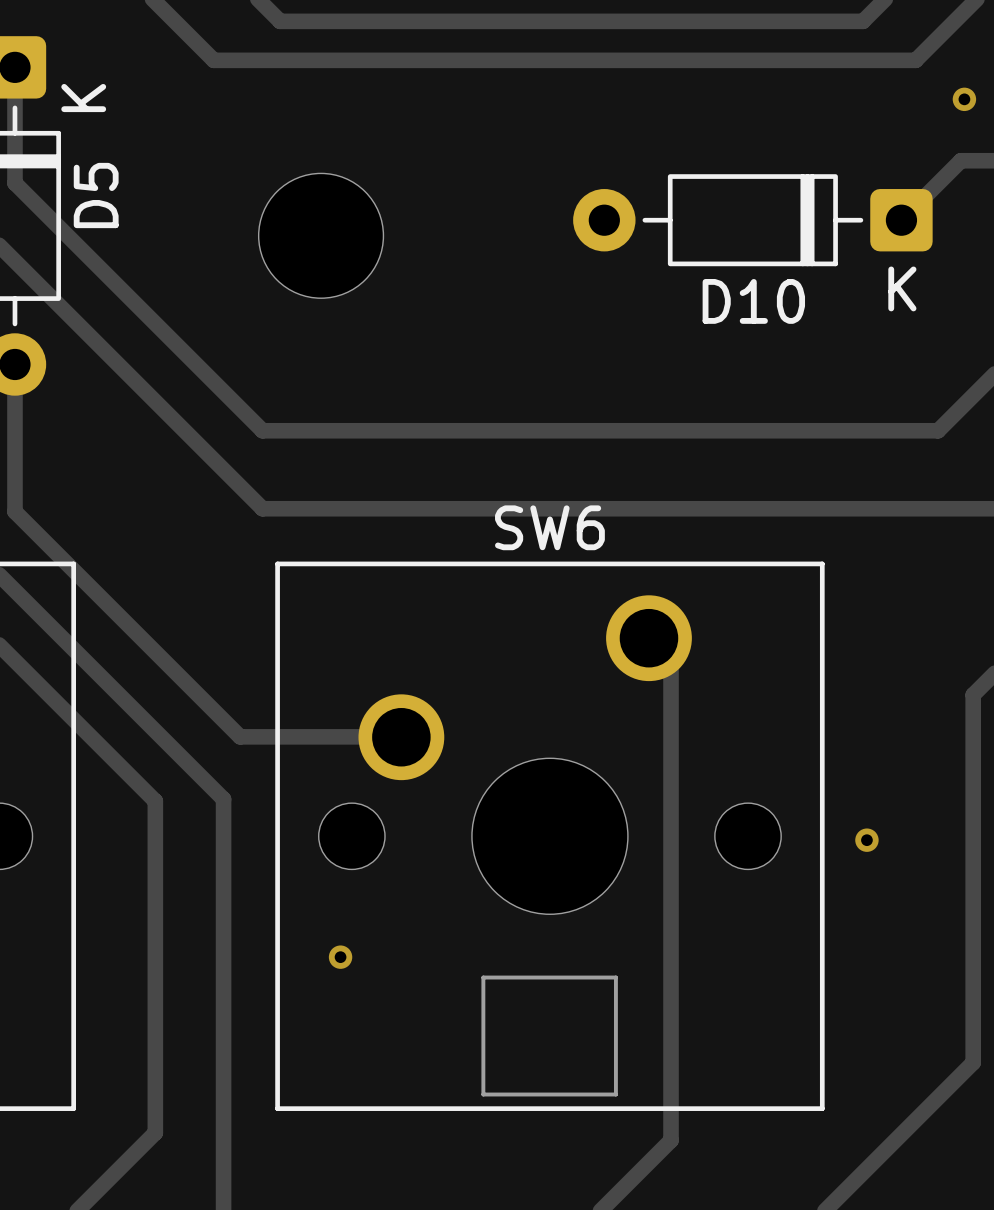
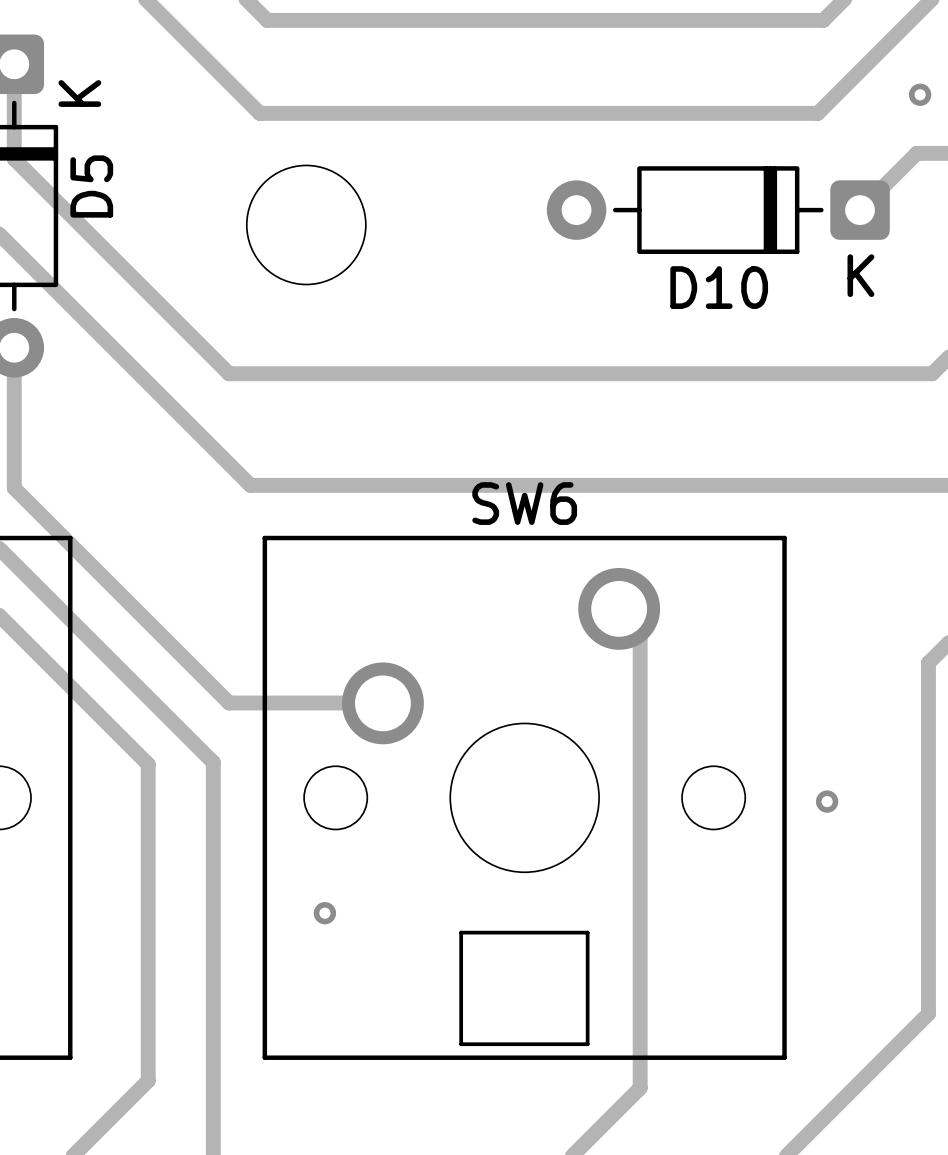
track: (213, 60) (915, 60) -> (204, 57) (259, 113) (817, 113) (873, 57)
track: (14, 166) (14, 183) (262, 430) (938, 430) (977, 391) -> (14, 158) (229, 373) (932, 373)

